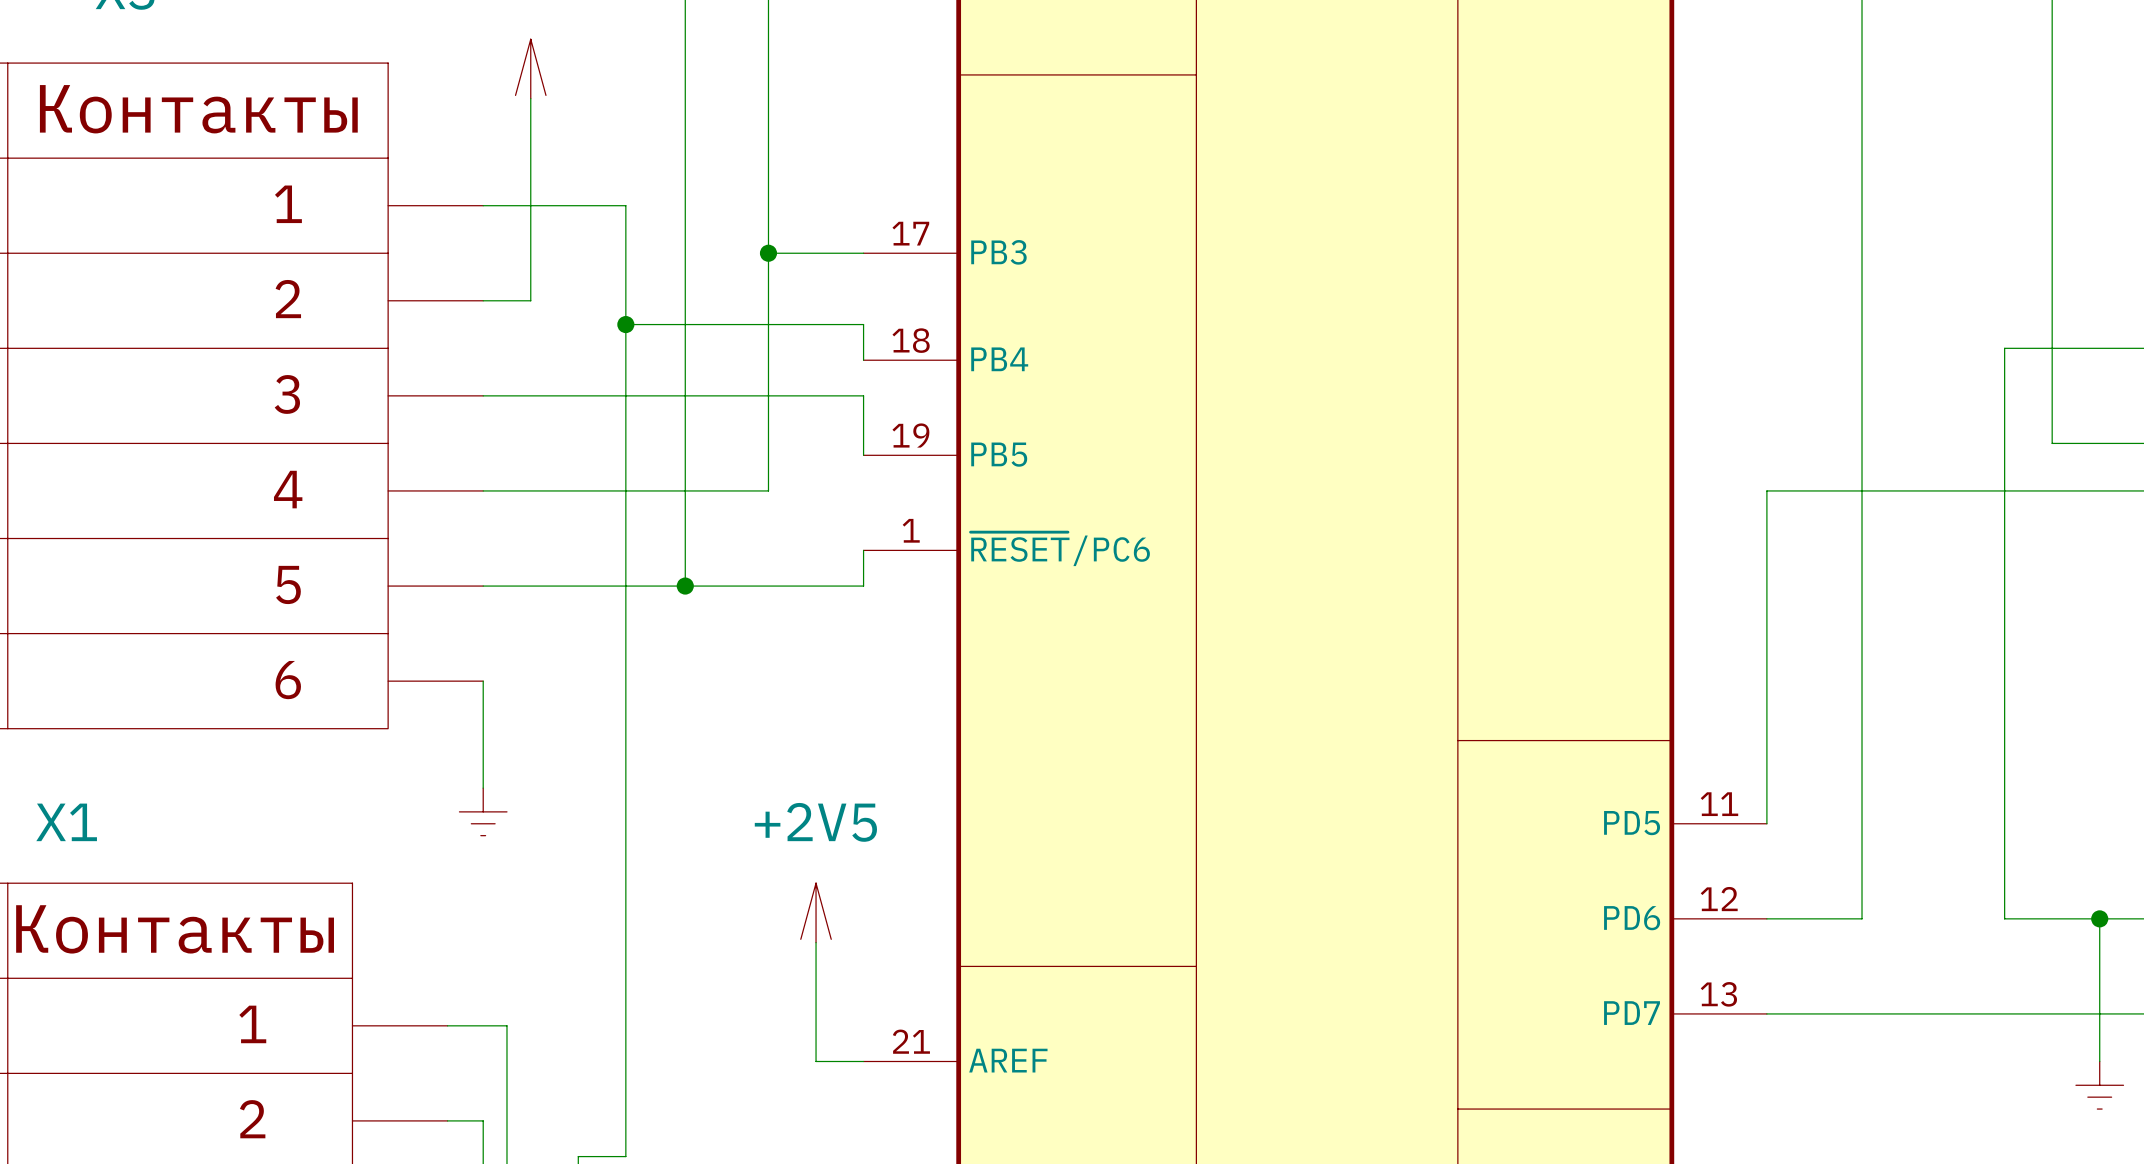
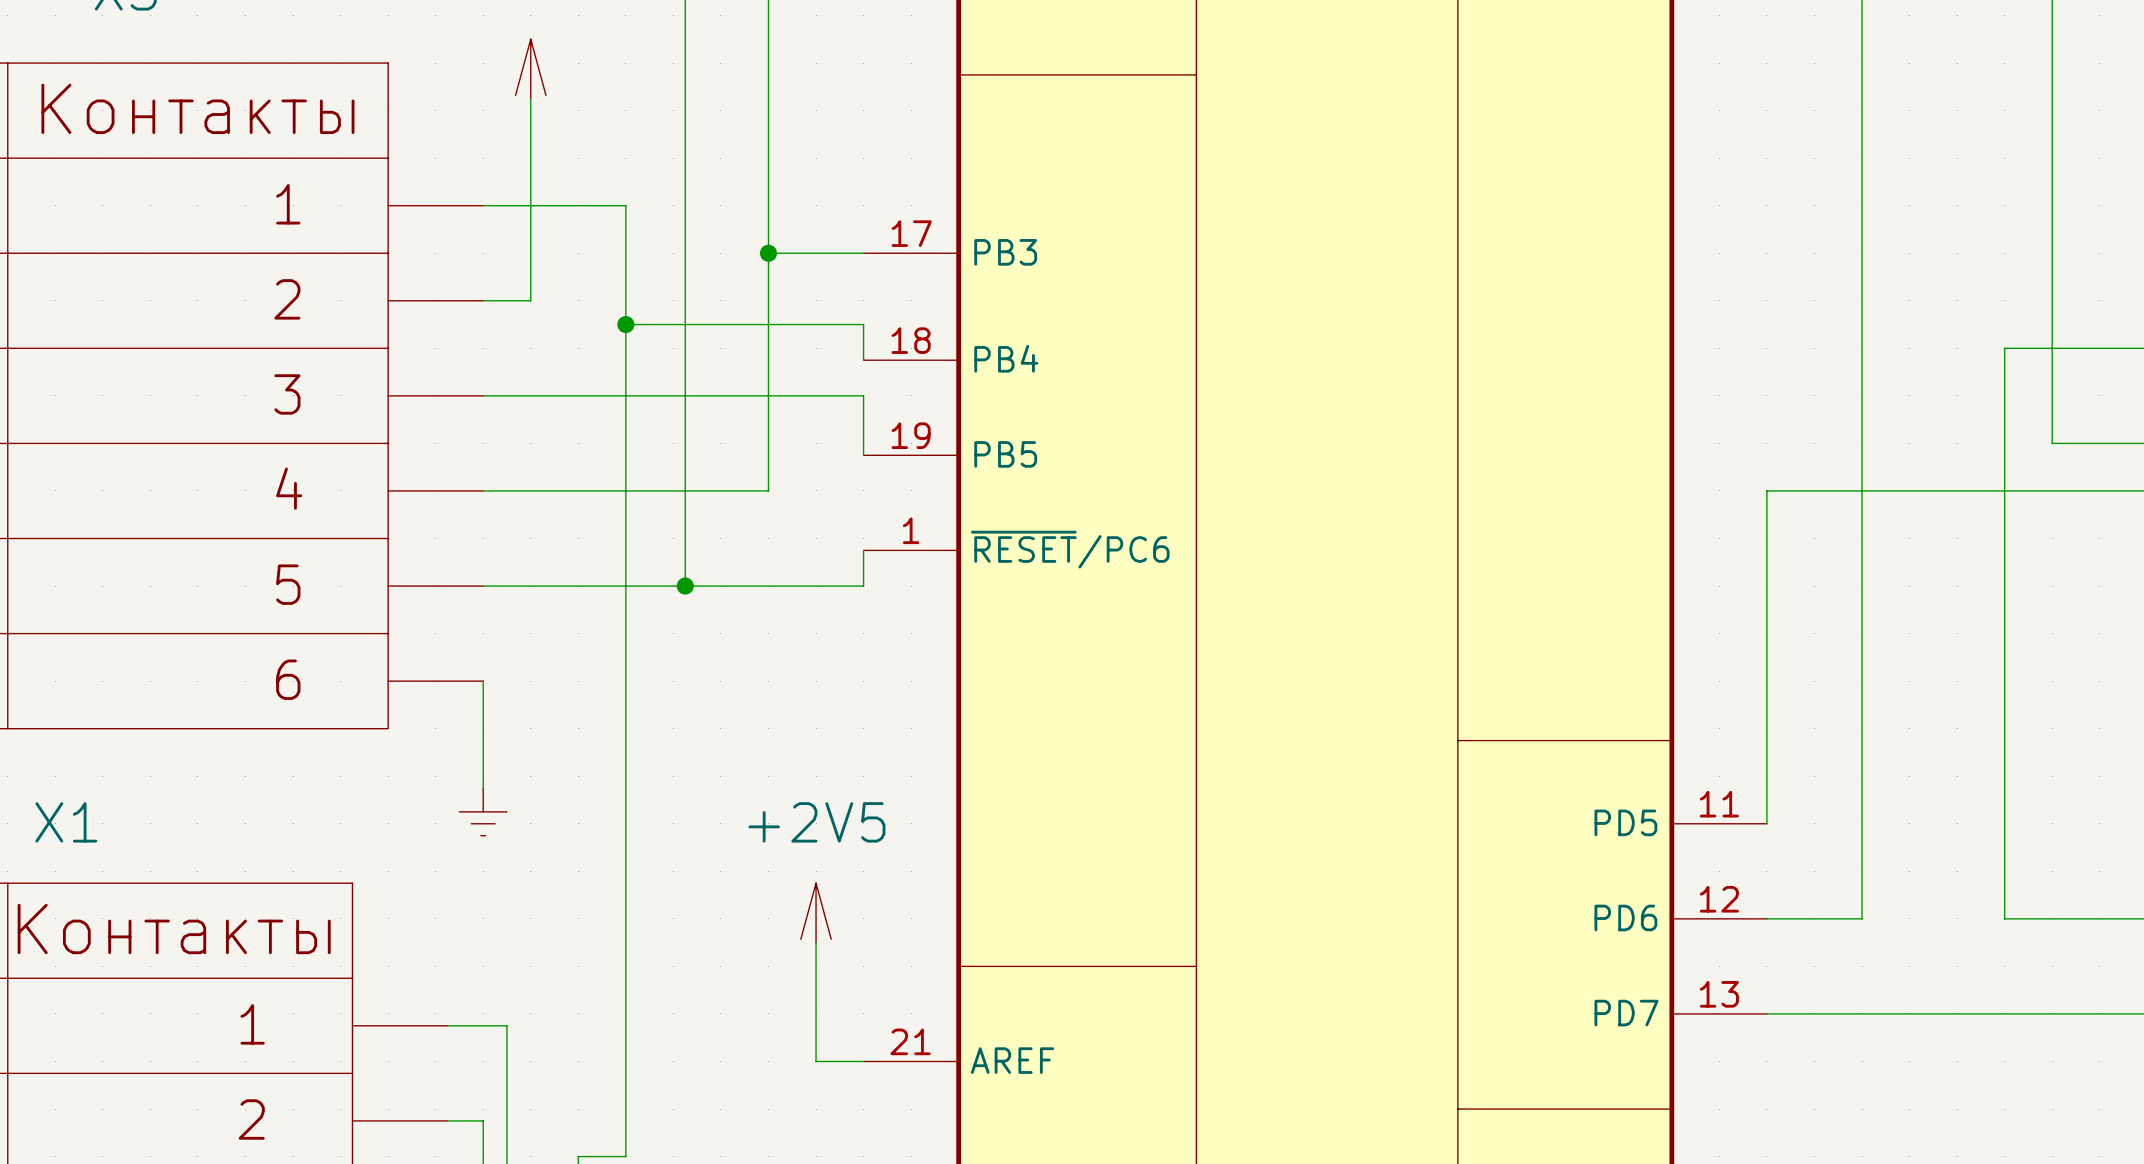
wire: (2099, 918) (2099, 1061) -> none
junction: (2099, 918) -> none
power symbol: (2099, 1085) -> none

